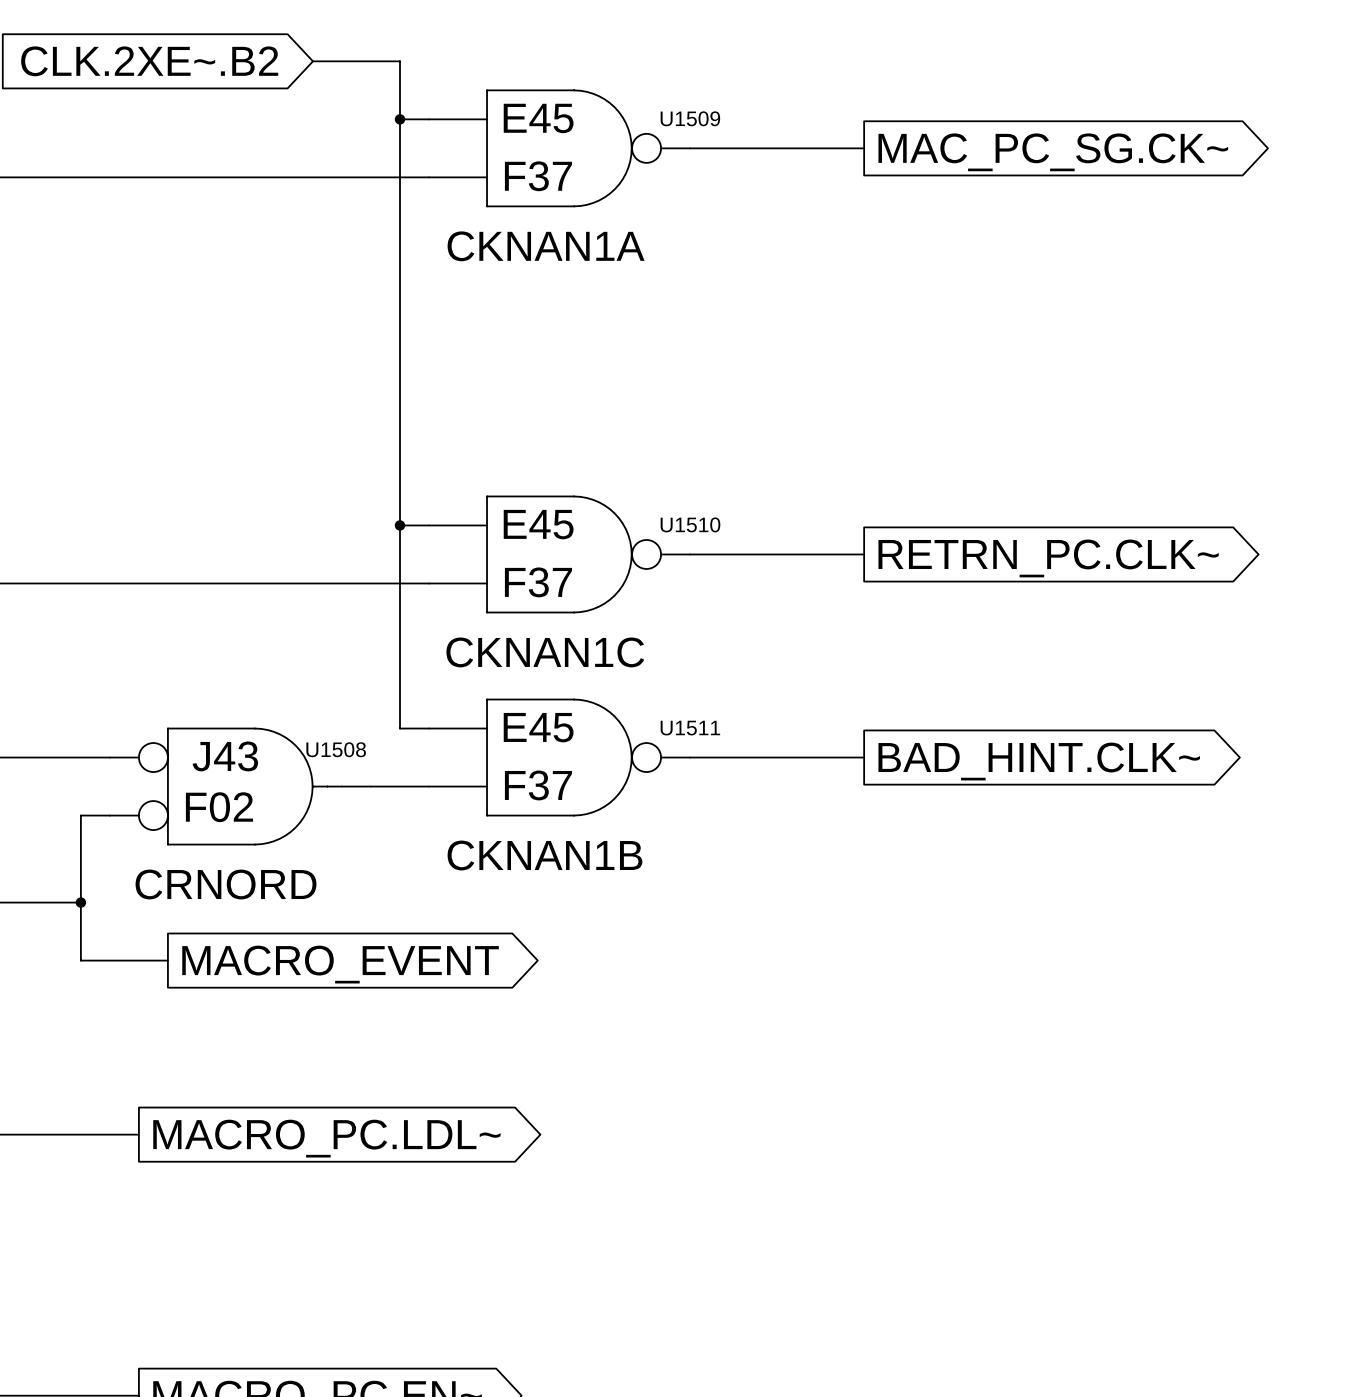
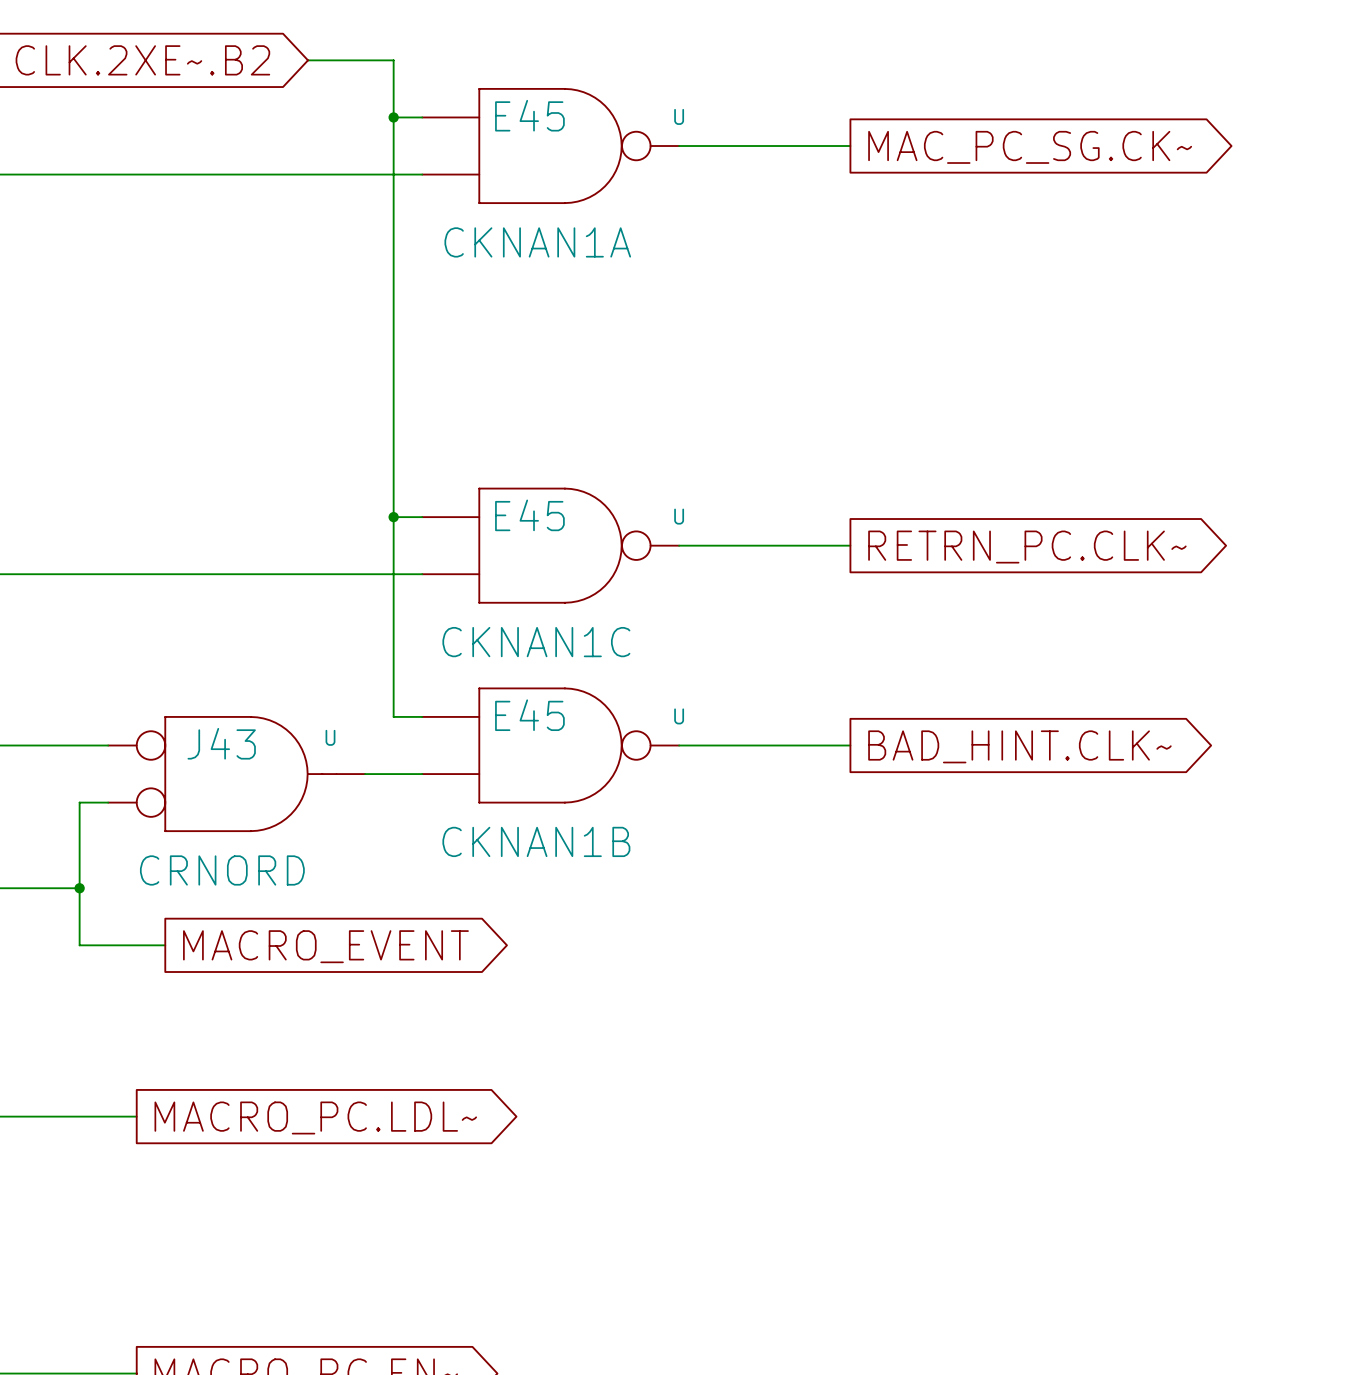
U1509 name: U1509 (690, 118) -> U (679, 116)
U1509 value: F37 (538, 176) -> none
U1510 name: U1510 (690, 524) -> U (679, 516)
U1510 value: F37 (538, 582) -> none
U1511 name: U1511 (690, 728) -> U (679, 716)
U1508 name: U1508 (336, 749) -> U (330, 737)
U1511 value: F37 (538, 785) -> none
U1508 value: F02 (219, 807) -> none

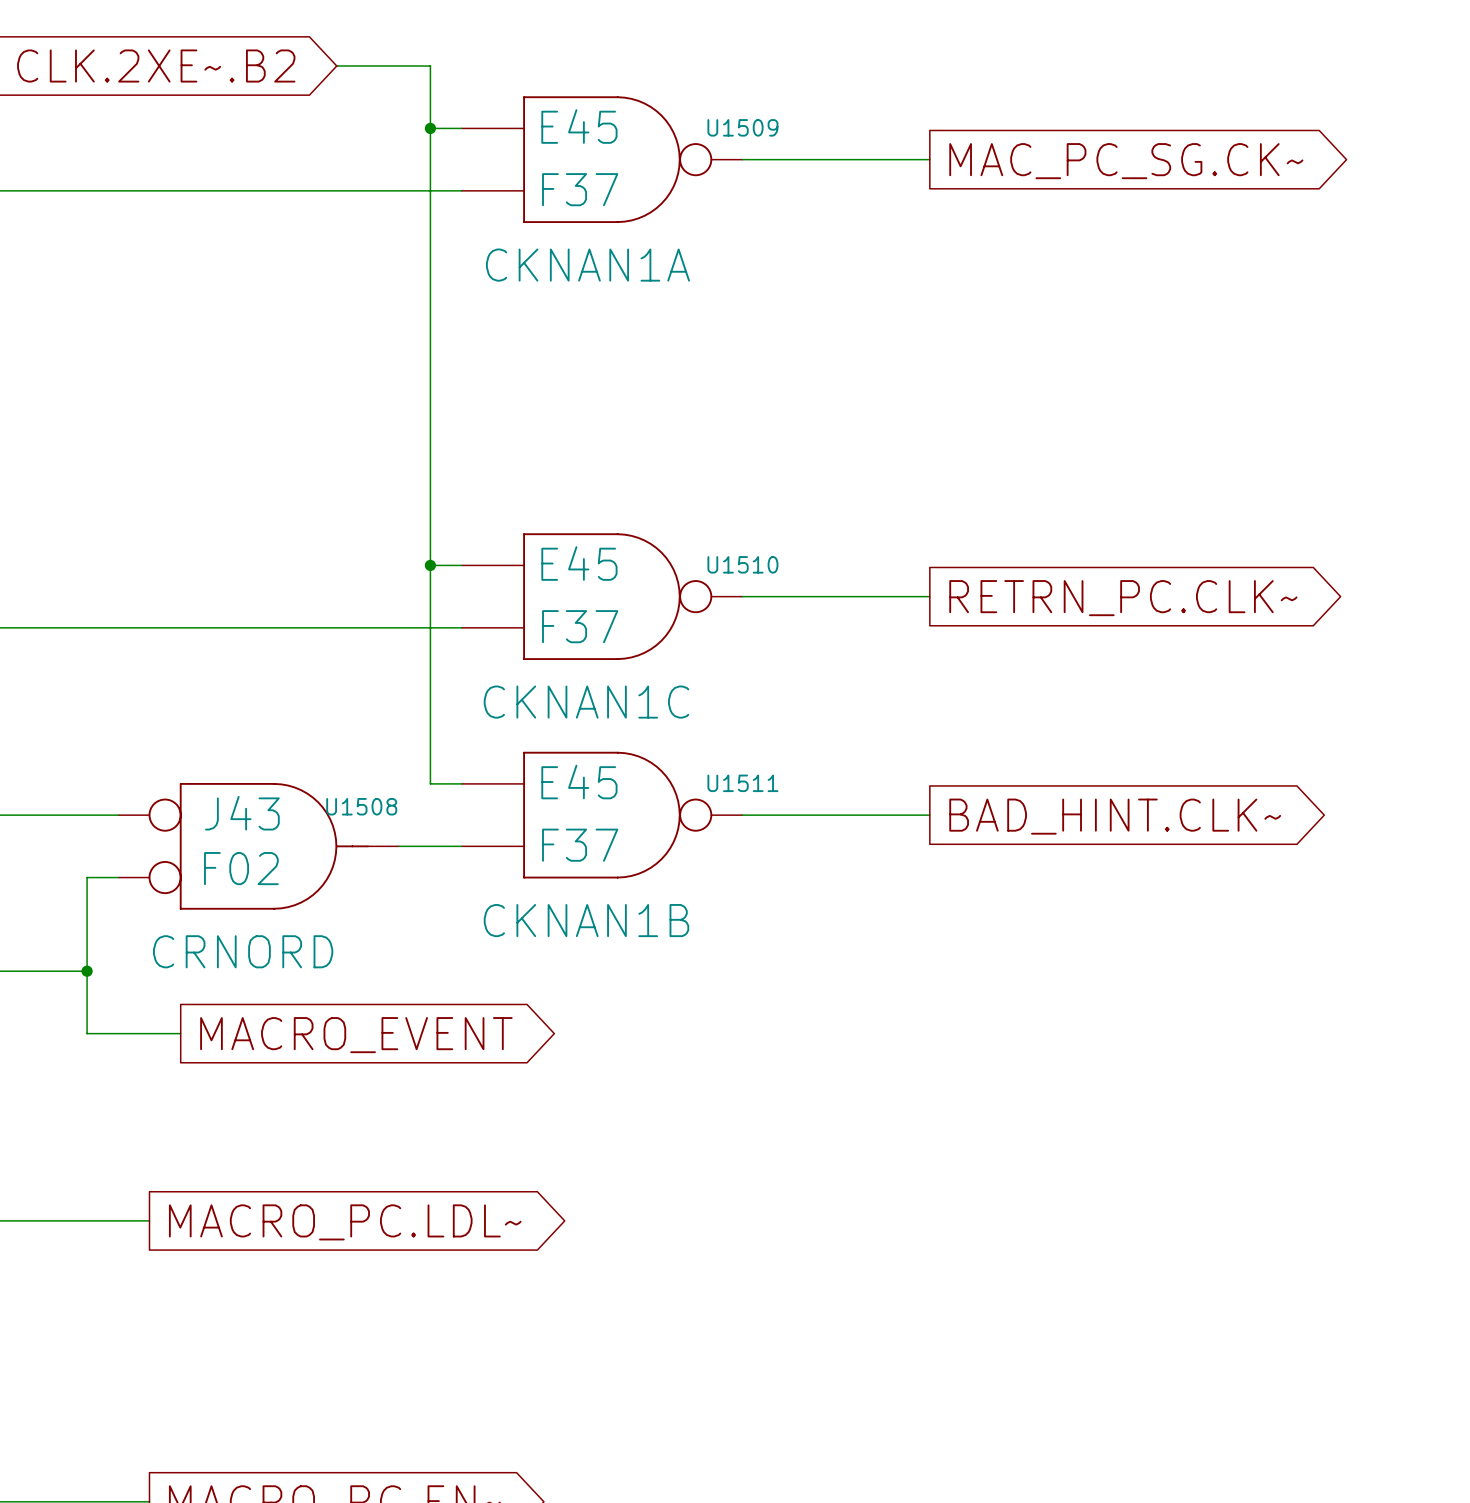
U name: U (679, 116) -> U1509 (742, 127)
U value: none -> F37 (580, 189)
U name: U (679, 516) -> U1510 (742, 564)
U value: none -> F37 (580, 626)
U name: U (679, 716) -> U1511 (742, 783)
U name: U (330, 737) -> U1508 (361, 806)
U value: none -> F37 (580, 845)
U value: none -> F02 (241, 868)

